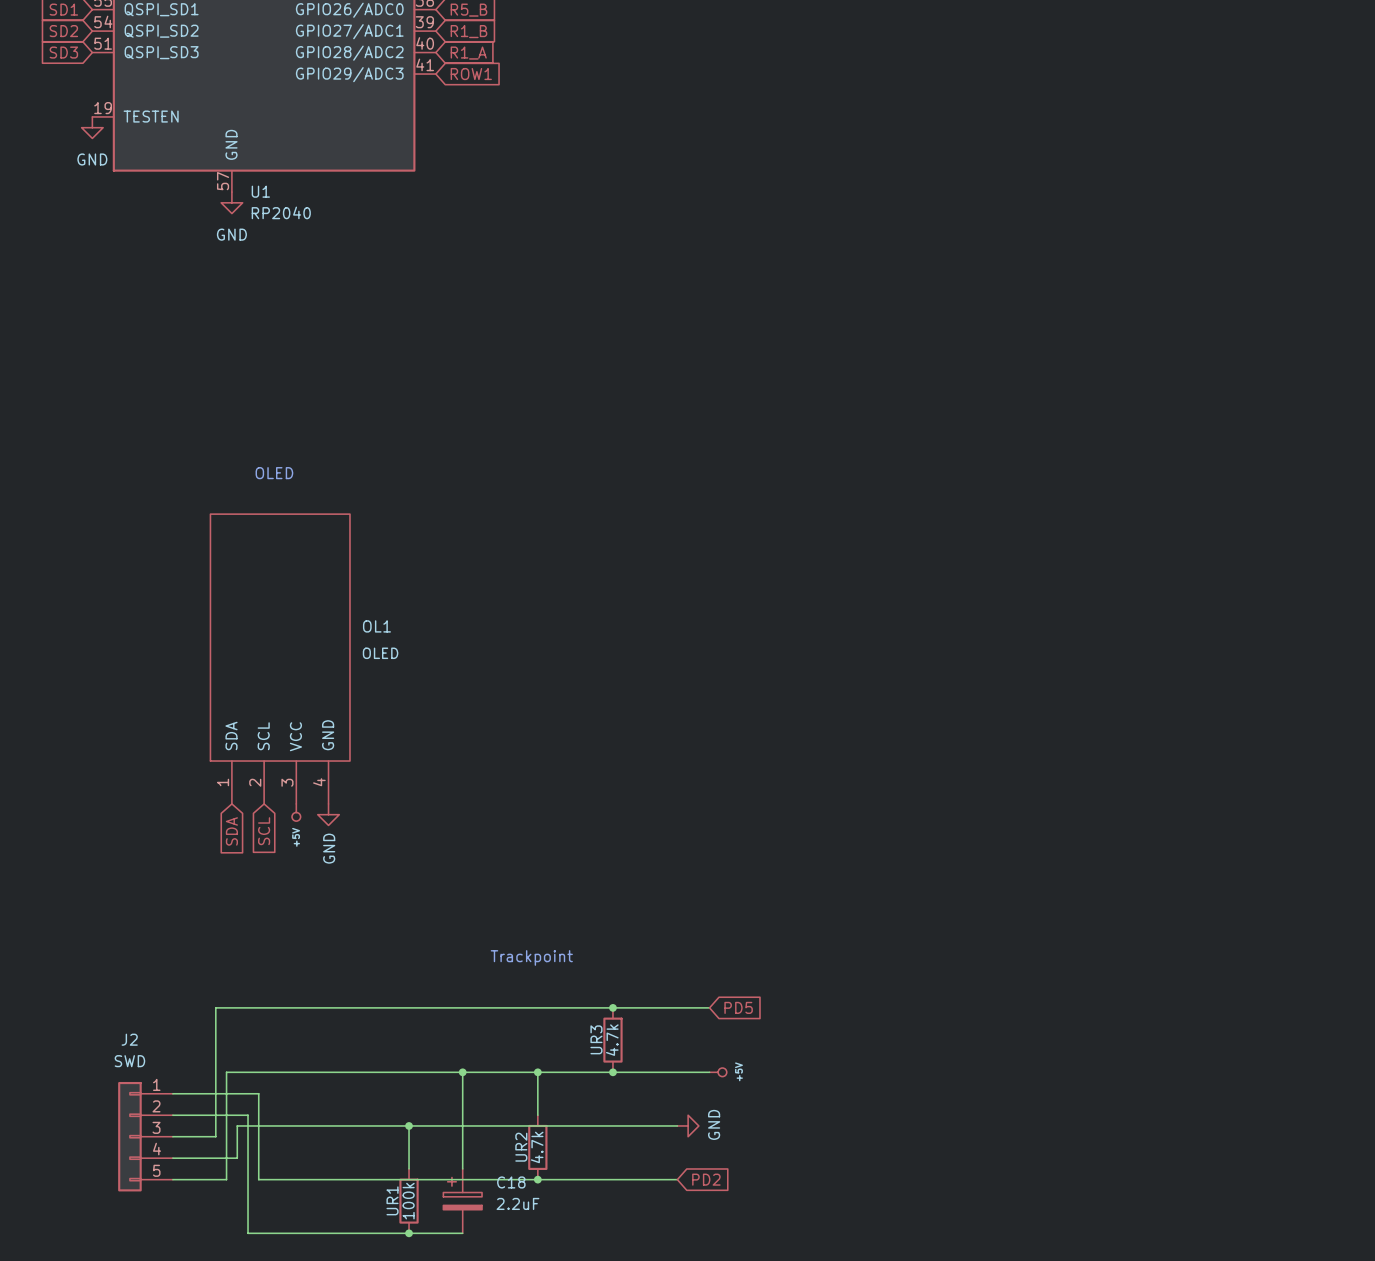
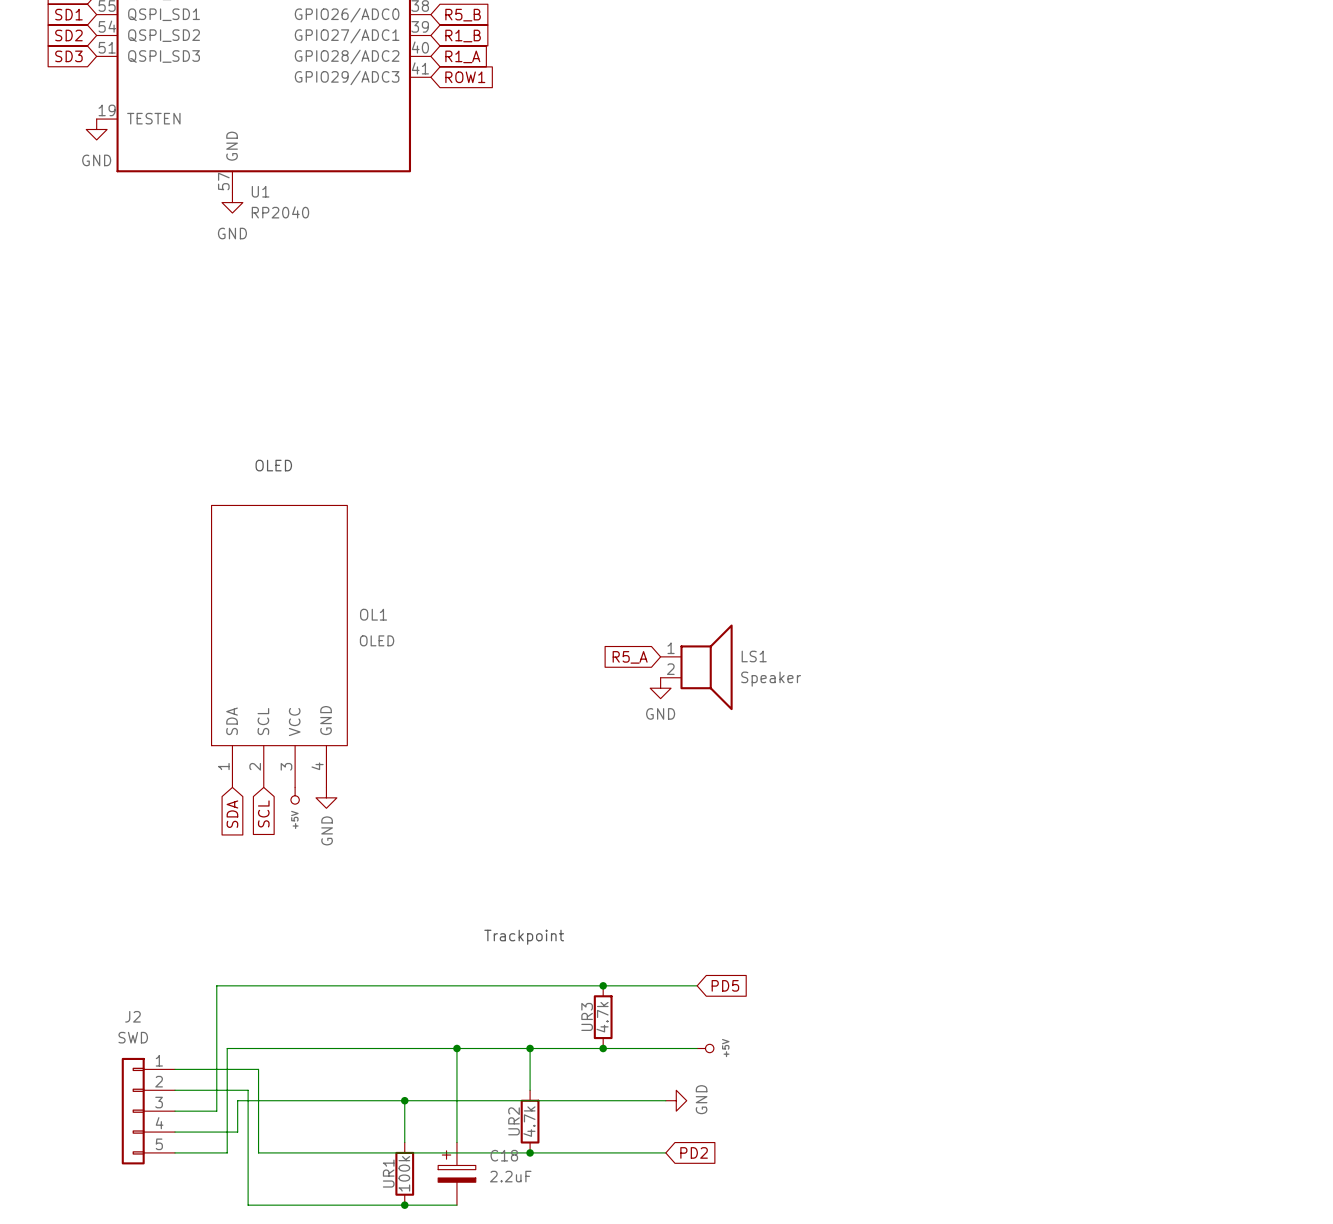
global label: none -> R5_A (630, 657)
LS1: none -> Speaker (696, 667)
power symbol: none -> GND (660, 688)

